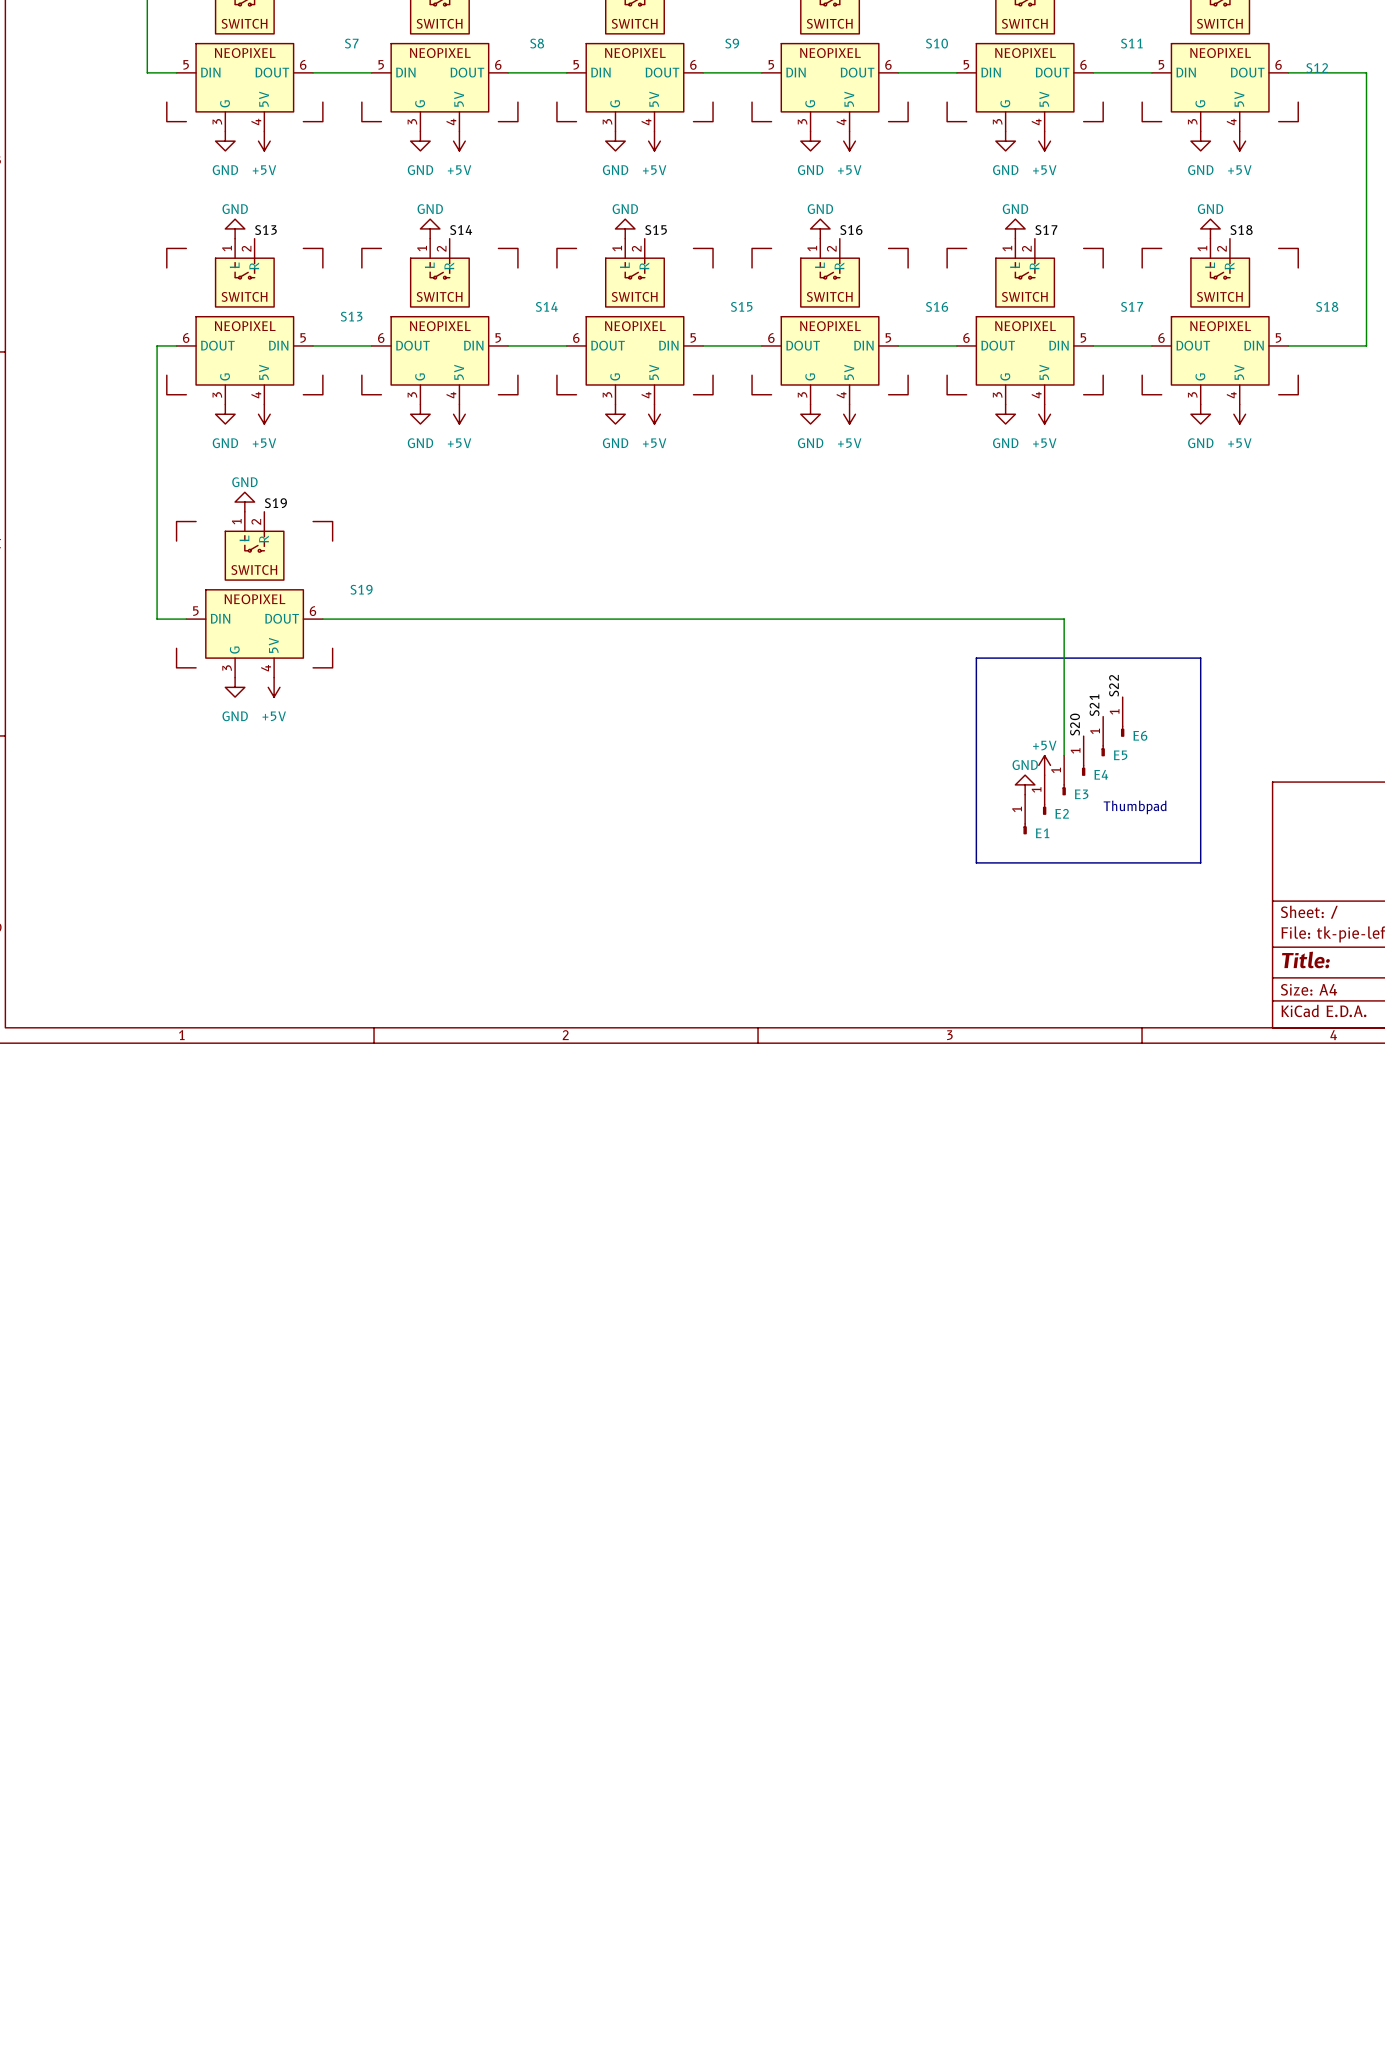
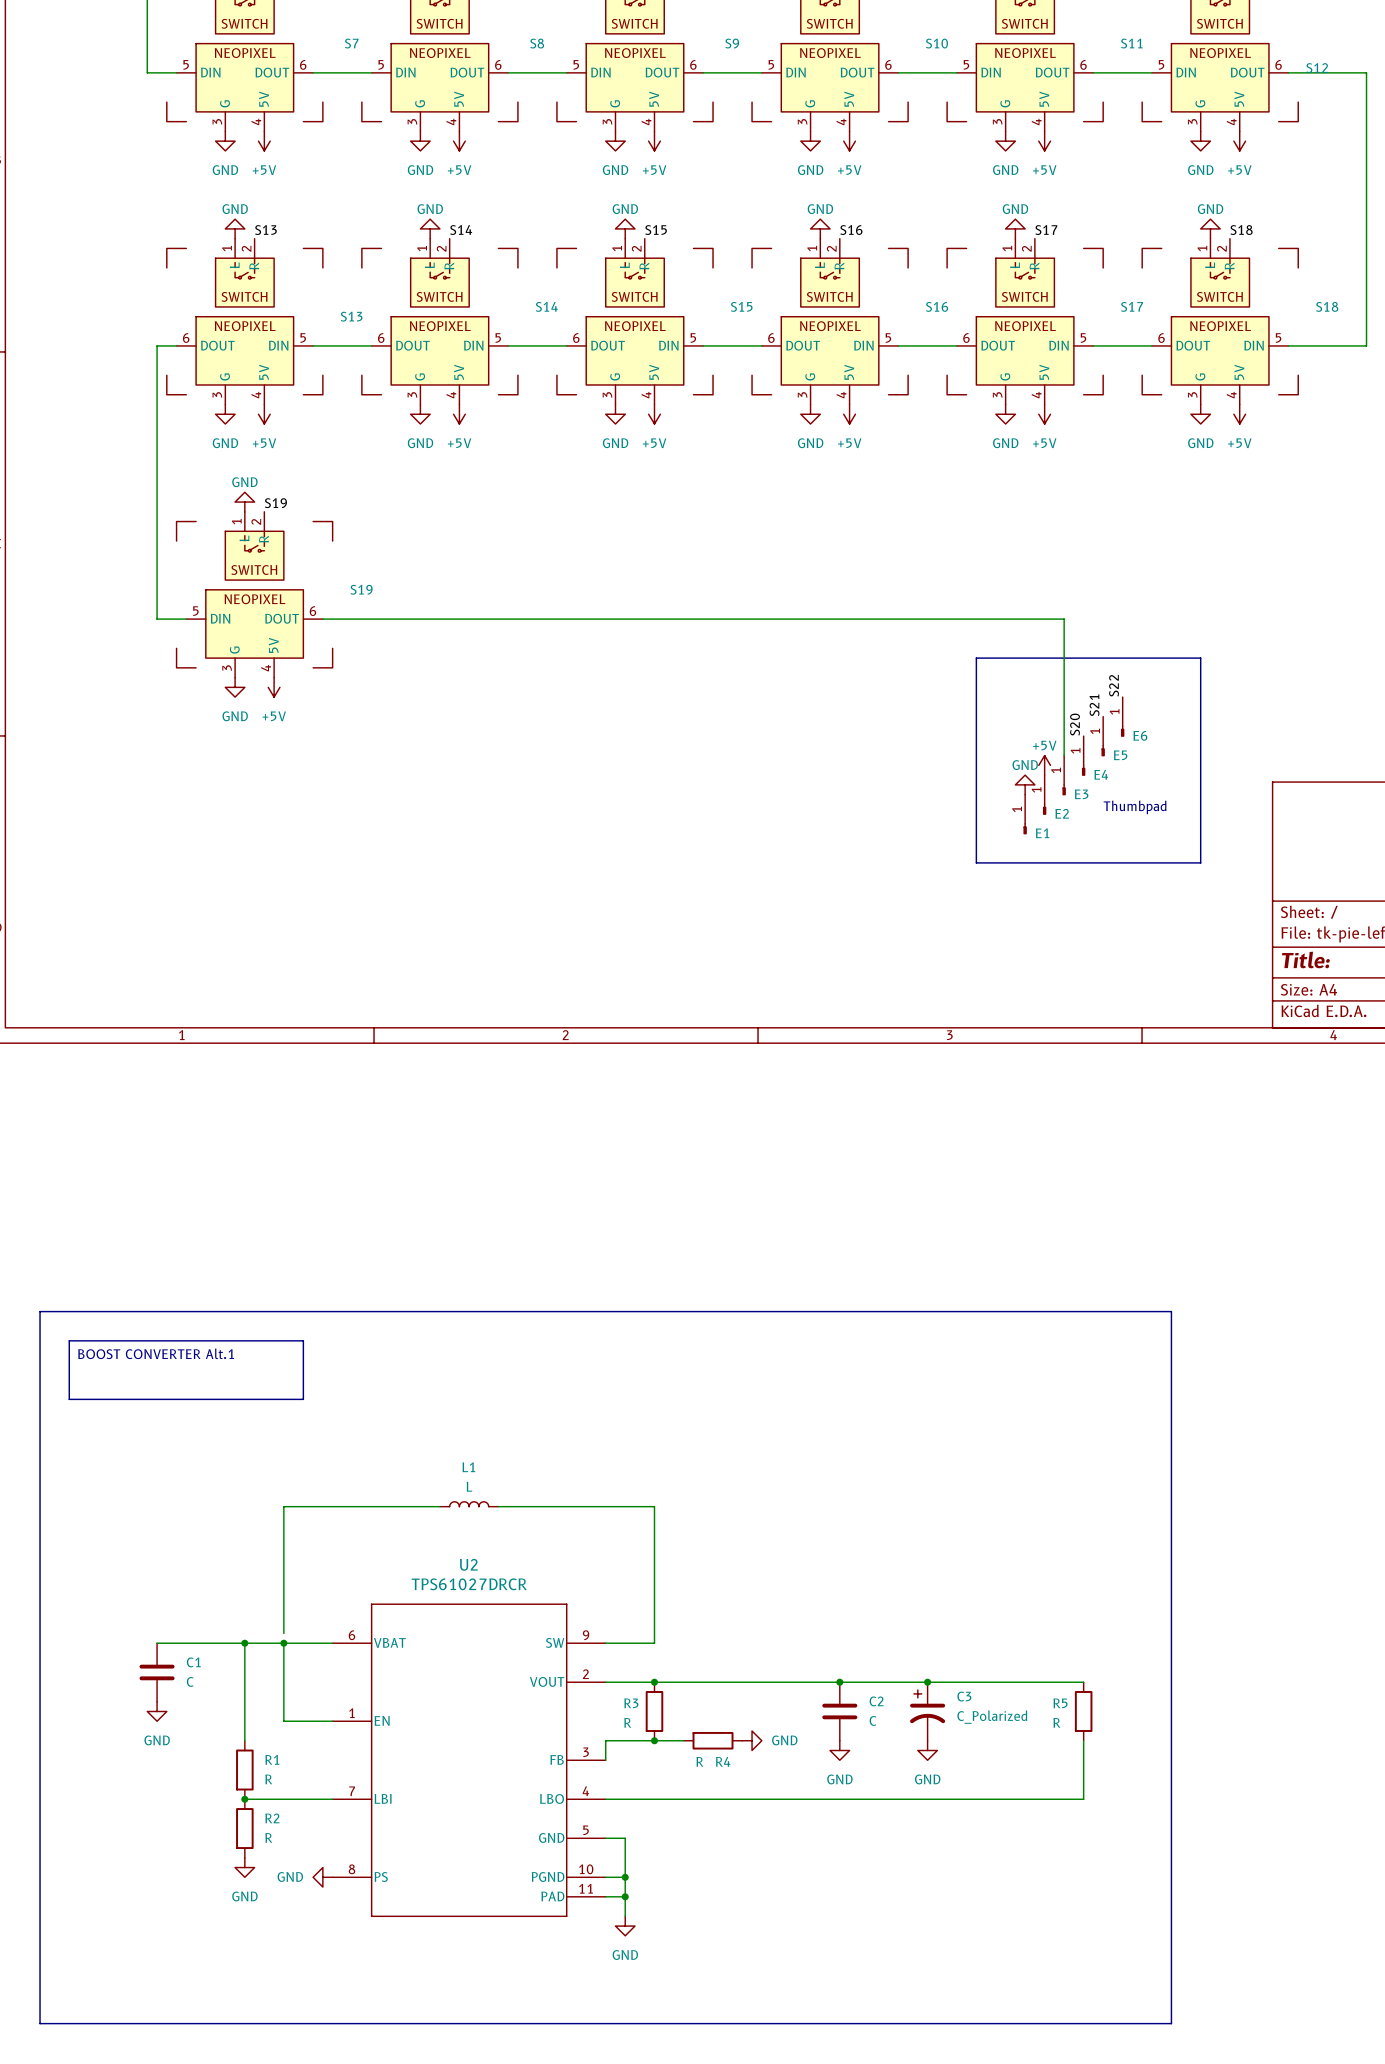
line: none -> (40, 1311) (1171, 1311) (1171, 2023) (40, 2023) (40, 1311)
line: none -> (69, 1340) (303, 1340) (303, 1399) (69, 1399) (69, 1340)
text: none -> BOOST CONVERTER Alt.1 (156, 1353)
L1: none -> L (469, 1504)
wire: none -> (439, 1506) (283, 1506) (283, 1633)
wire: none -> (498, 1506) (654, 1506) (654, 1643) (605, 1643)
wire: none -> (157, 1643) (332, 1643)
wire: none -> (244, 1643) (244, 1740)
junction: none -> (244, 1643)
wire: none -> (283, 1643) (283, 1721) (332, 1721)
junction: none -> (283, 1643)
C1: none -> C (157, 1672)
wire: none -> (605, 1682) (1083, 1682)
junction: none -> (654, 1682)
junction: none -> (839, 1682)
junction: none -> (927, 1682)
power symbol: none -> GND (157, 1711)
R3: none -> R (654, 1711)
C2: none -> C (839, 1711)
C3: none -> C_Polarized (927, 1711)
R5: none -> R (1083, 1711)
junction: none -> (654, 1740)
wire: none -> (683, 1740) (605, 1740) (605, 1760)
R4: none -> R (713, 1740)
power symbol: none -> GND (752, 1740)
wire: none -> (1083, 1740) (1083, 1799) (605, 1799)
power symbol: none -> GND (839, 1750)
power symbol: none -> GND (927, 1750)
U2: none -> TPS61027DRCR (469, 1760)
R1: none -> R (244, 1770)
wire: none -> (244, 1799) (332, 1799)
junction: none -> (244, 1799)
R2: none -> R (244, 1828)
wire: none -> (605, 1838) (625, 1838) (625, 1916)
power symbol: none -> GND (244, 1867)
power symbol: none -> GND (322, 1877)
wire: none -> (605, 1877) (625, 1877)
junction: none -> (625, 1877)
wire: none -> (605, 1896) (625, 1896)
junction: none -> (625, 1896)
power symbol: none -> GND (625, 1926)

